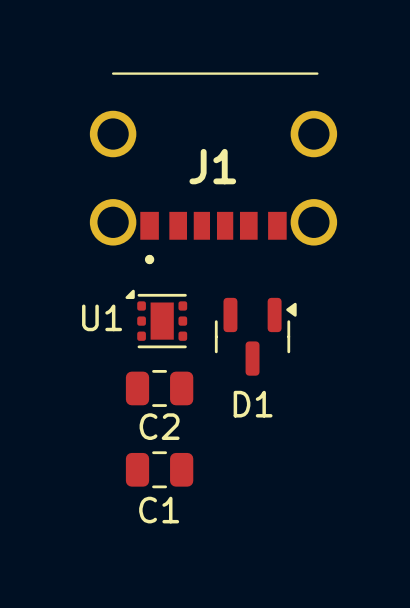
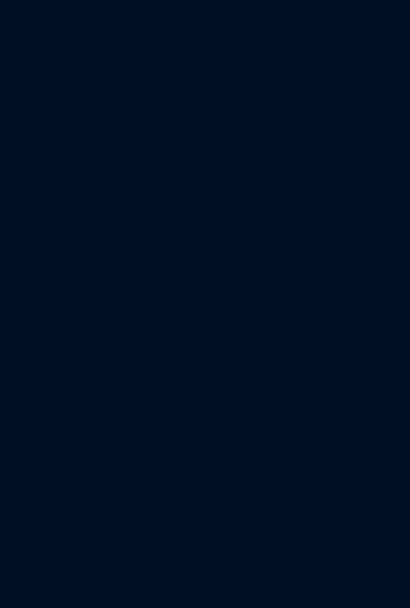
J1: (213, 168) -> none
U1: (156, 318) -> none
D1: (255, 336) -> none
C2: (159, 388) -> none
C1: (159, 469) -> none

